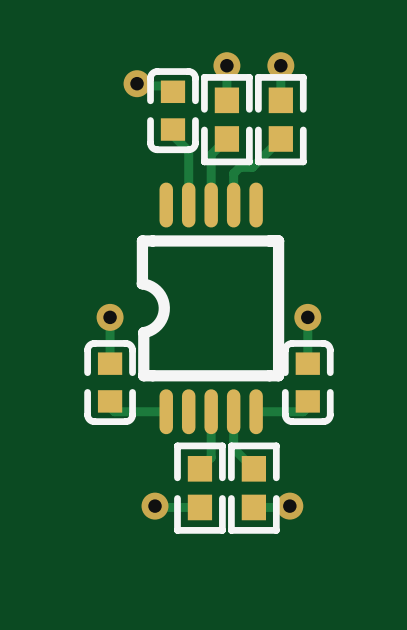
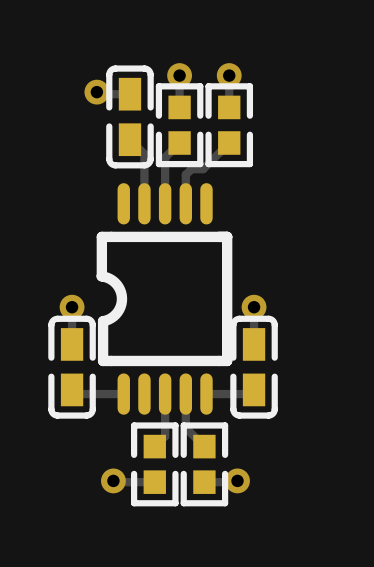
part footprint: [147, 68, 199, 154] -> [106, 65, 154, 169]
part footprint: [84, 340, 136, 426] -> [48, 315, 96, 419]
part footprint: [281, 340, 334, 426] -> [230, 315, 278, 419]

